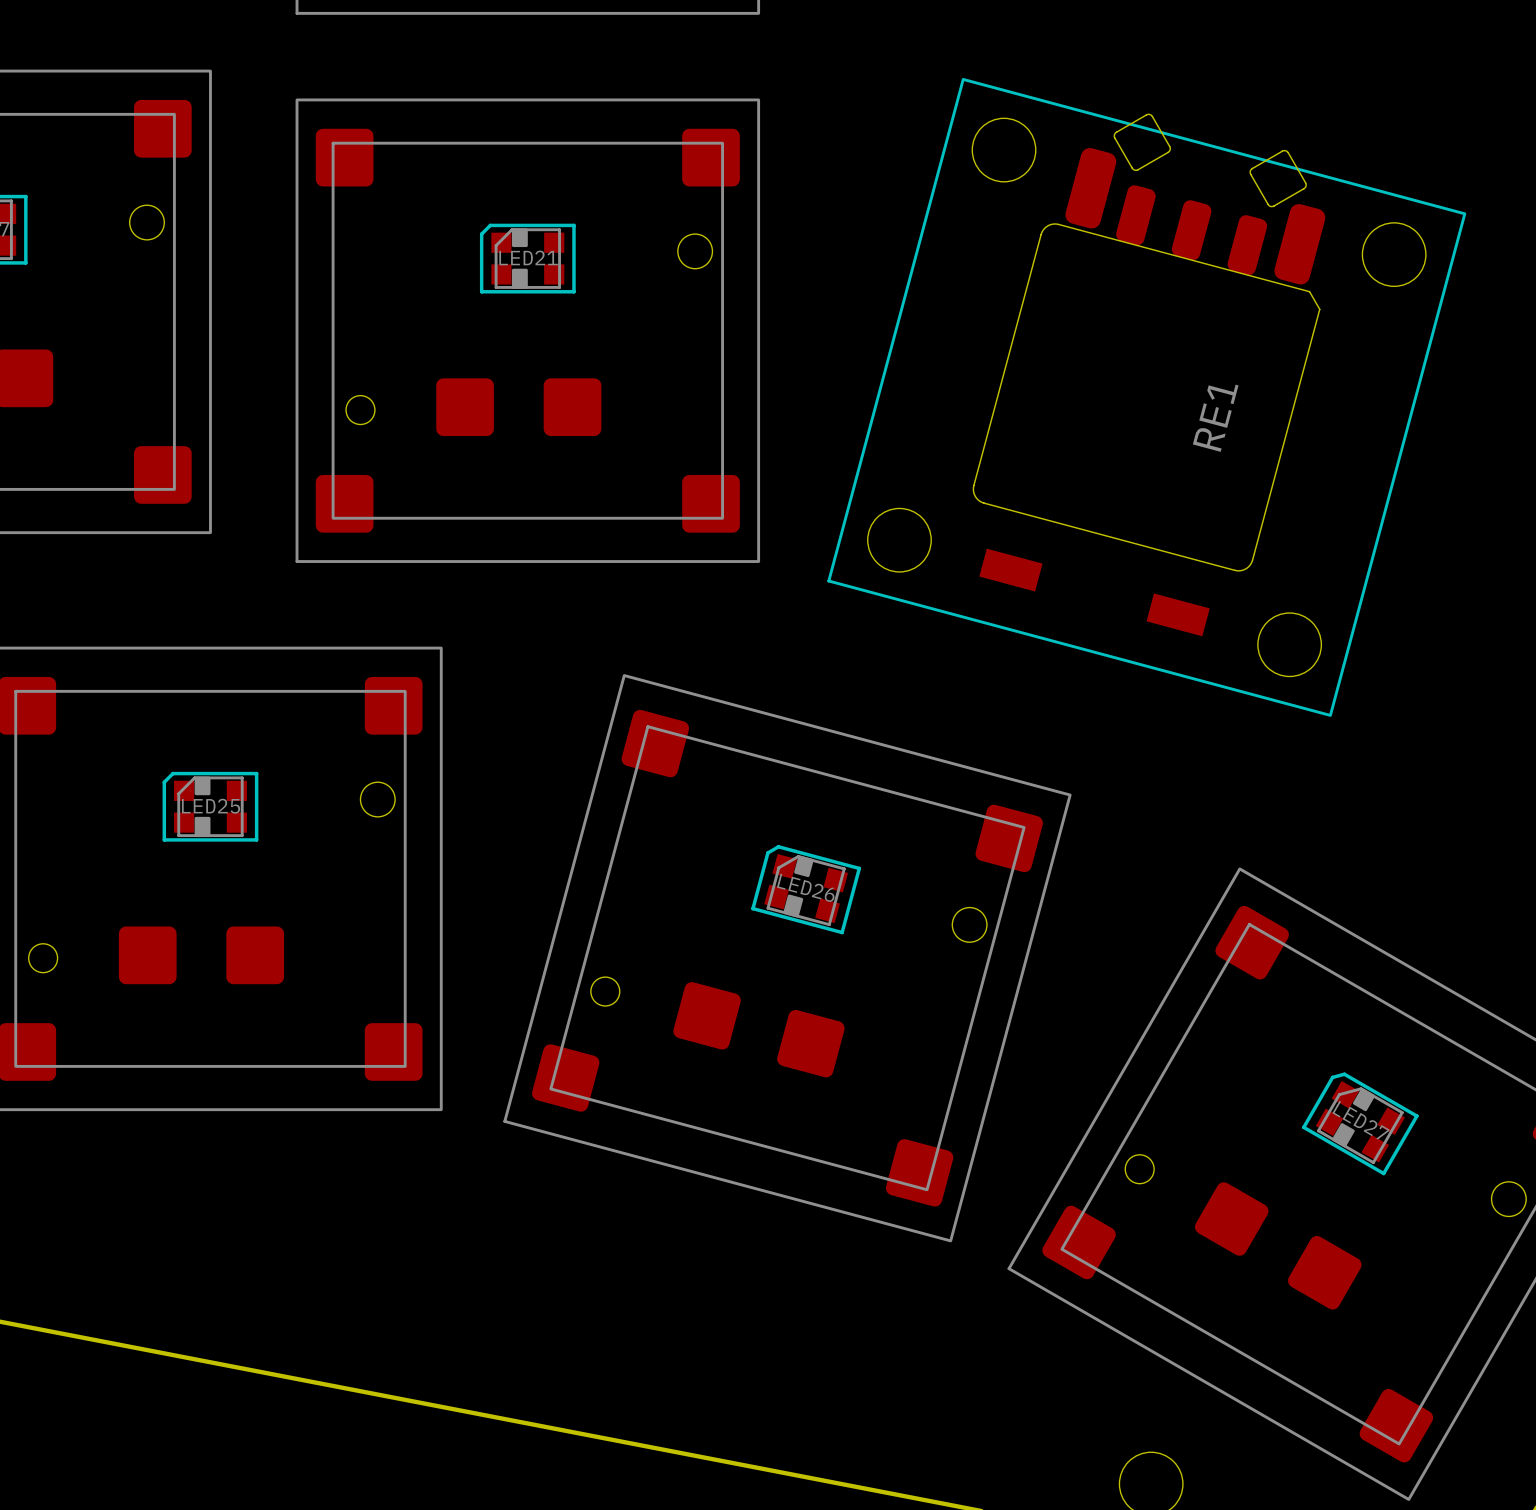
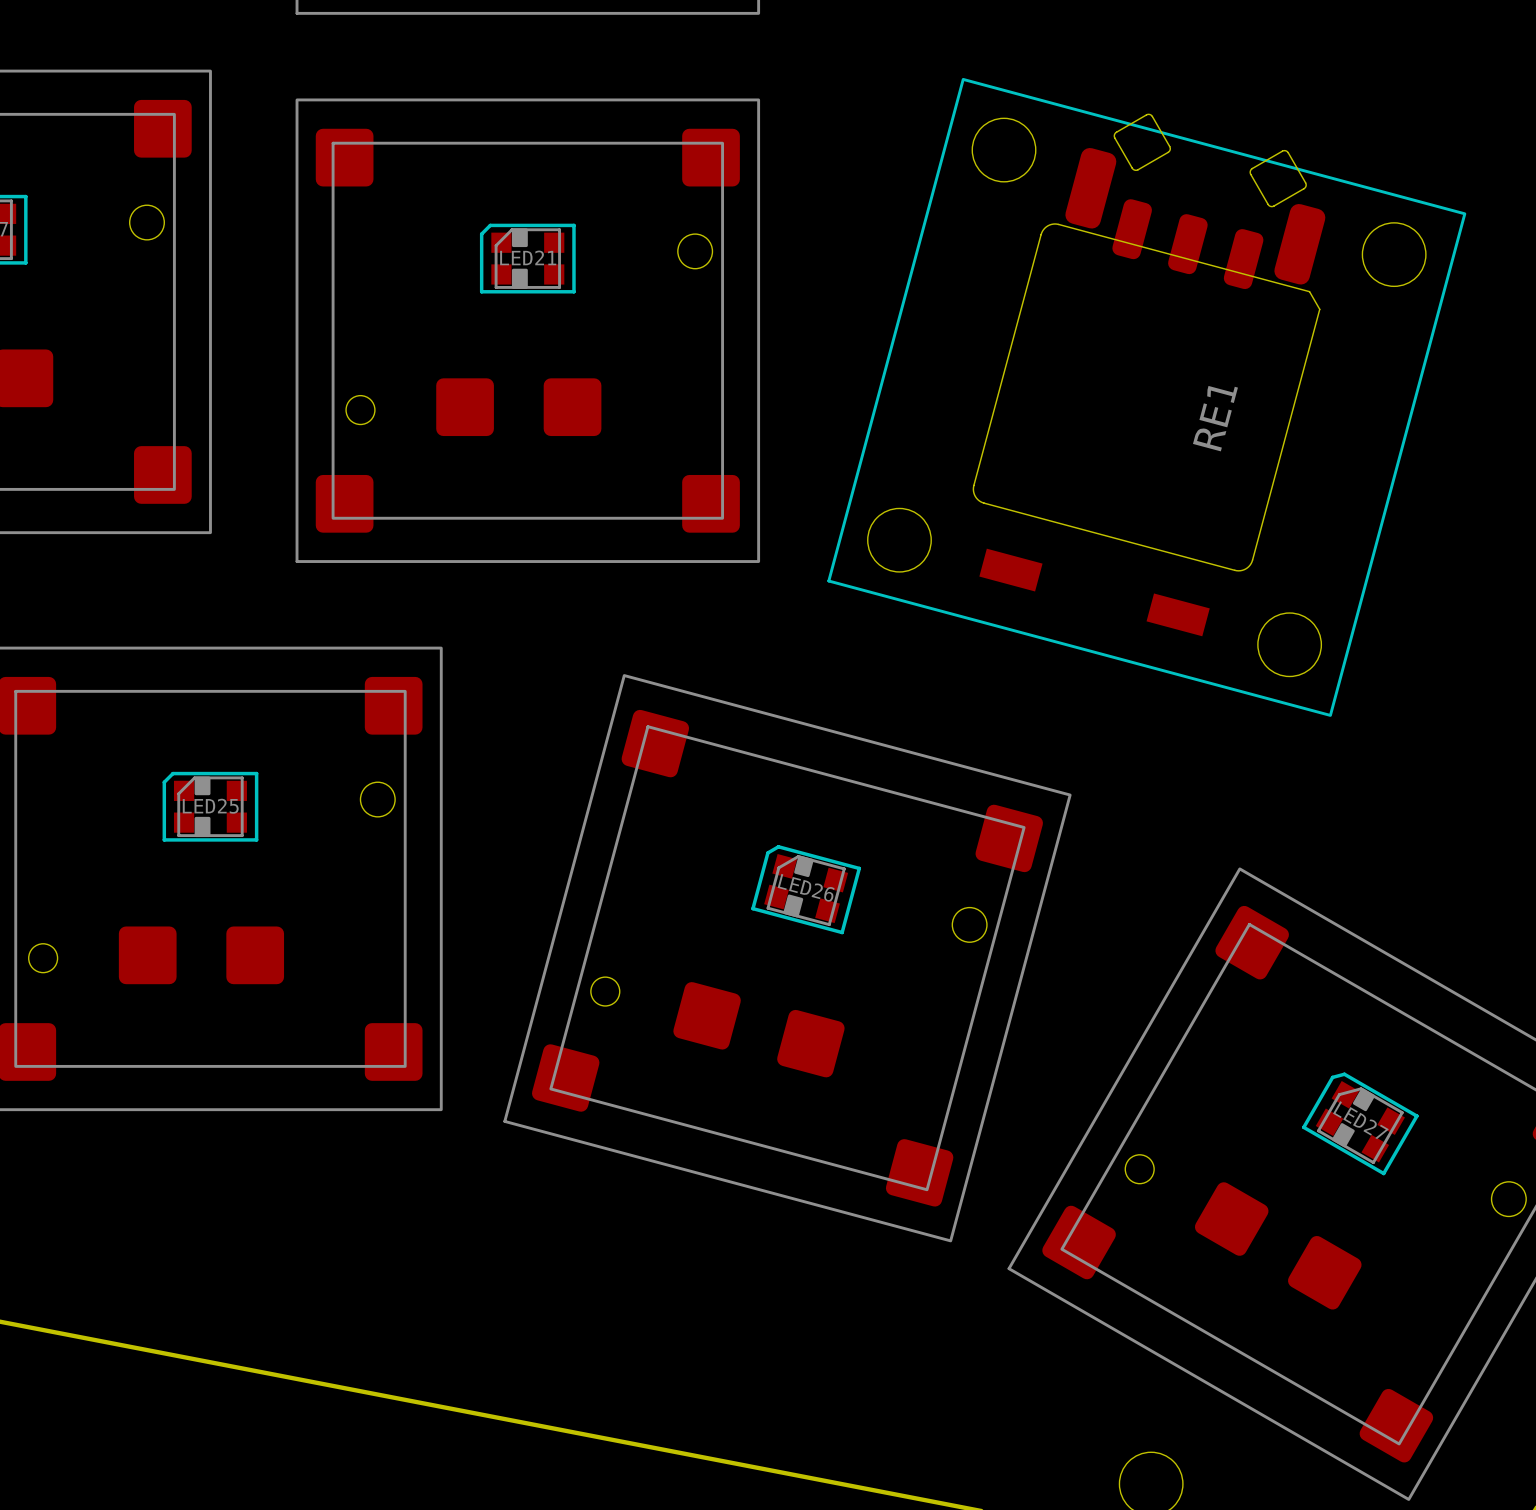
RE1 footprint: [827, 77, 1467, 717] -> [827, 77, 1467, 717]

